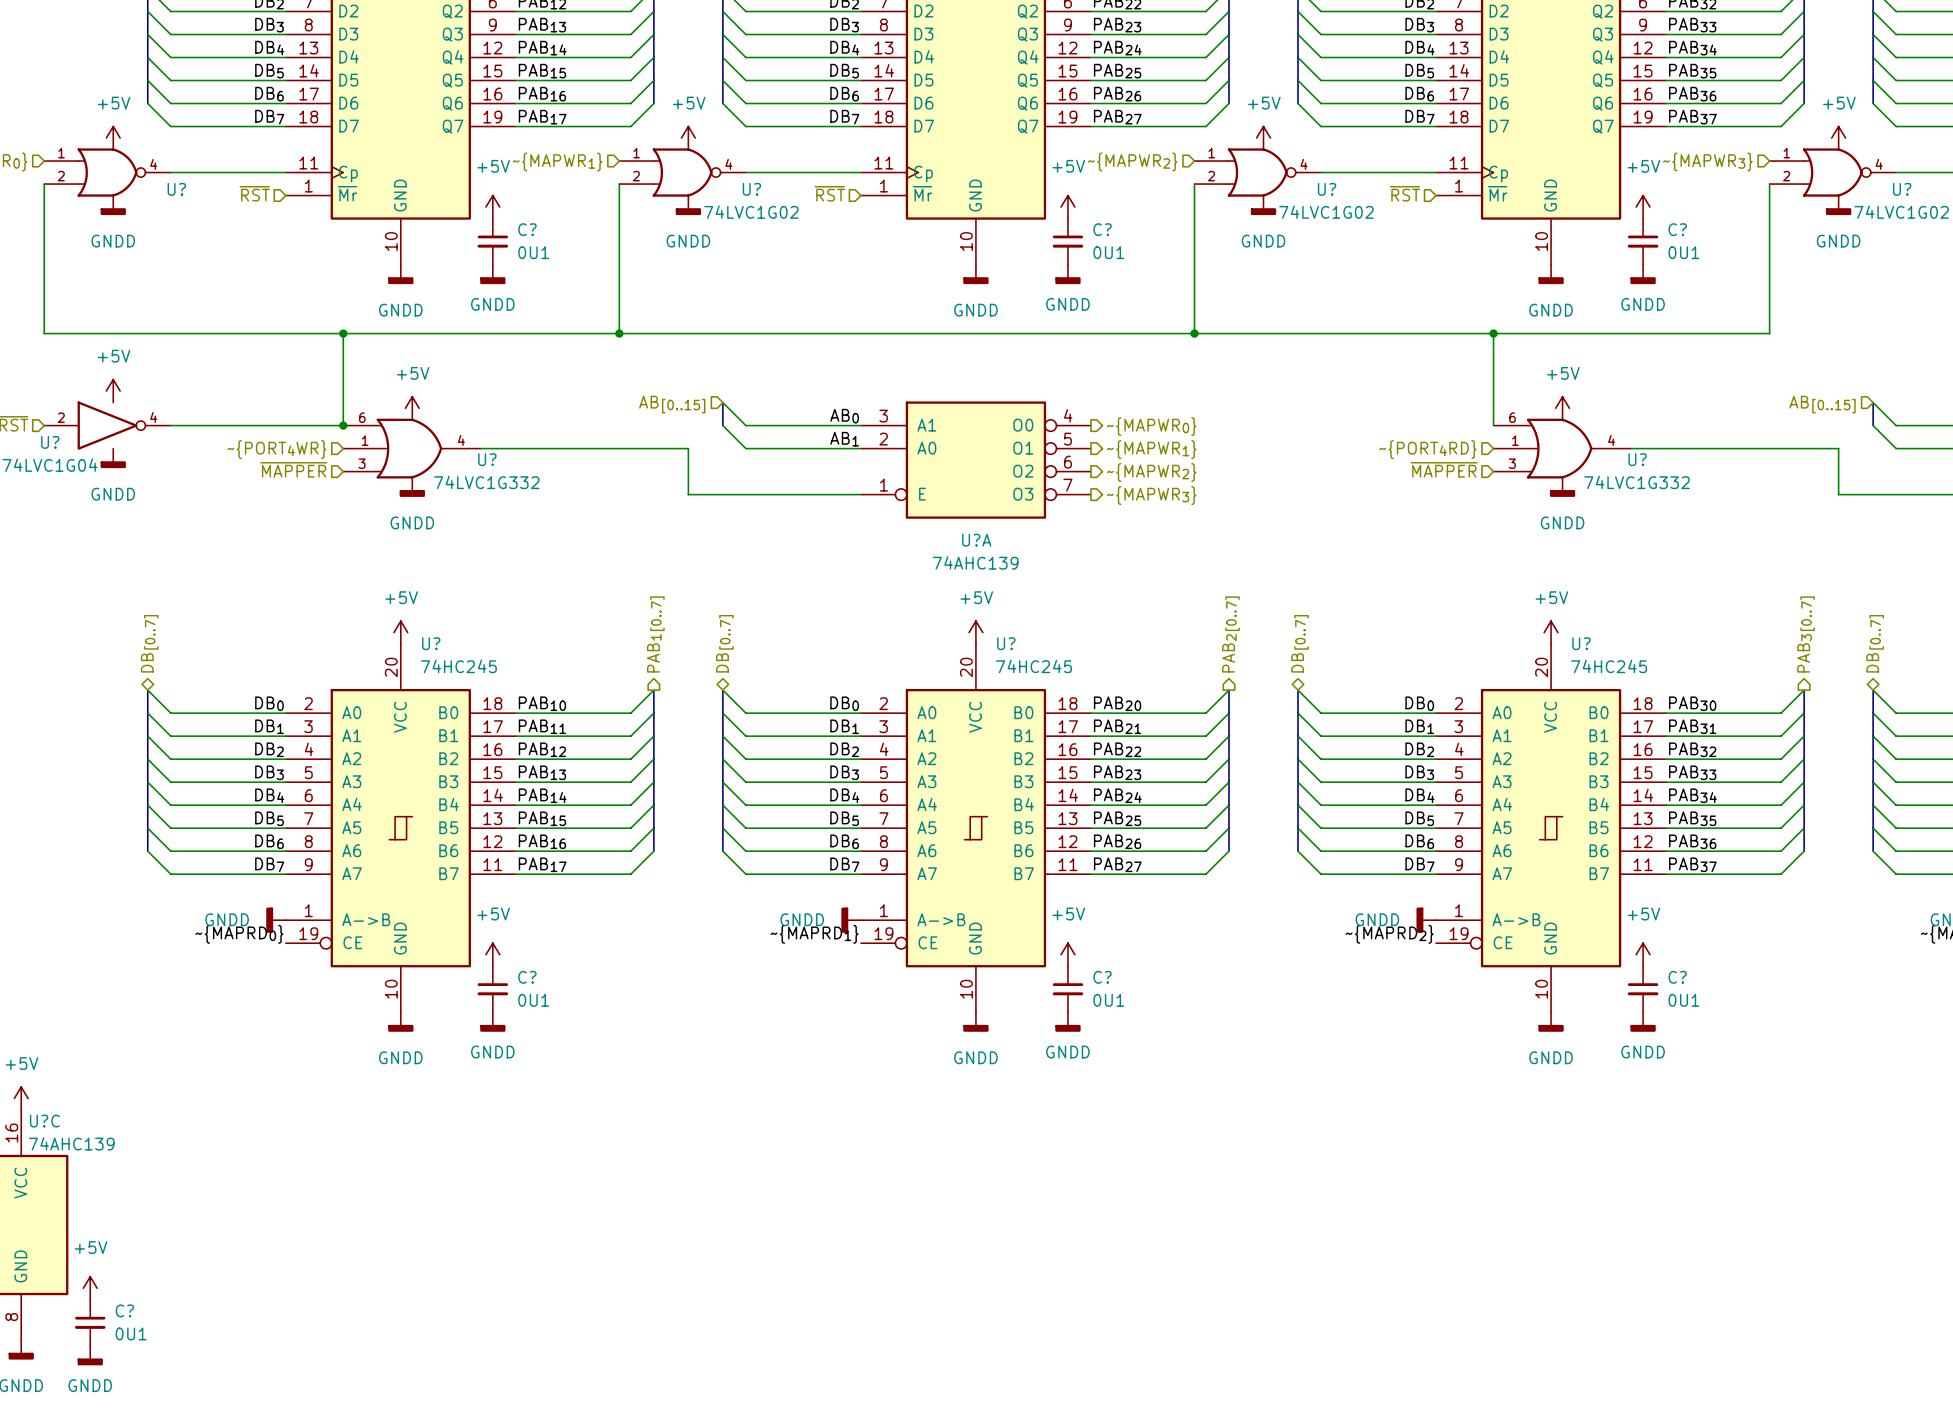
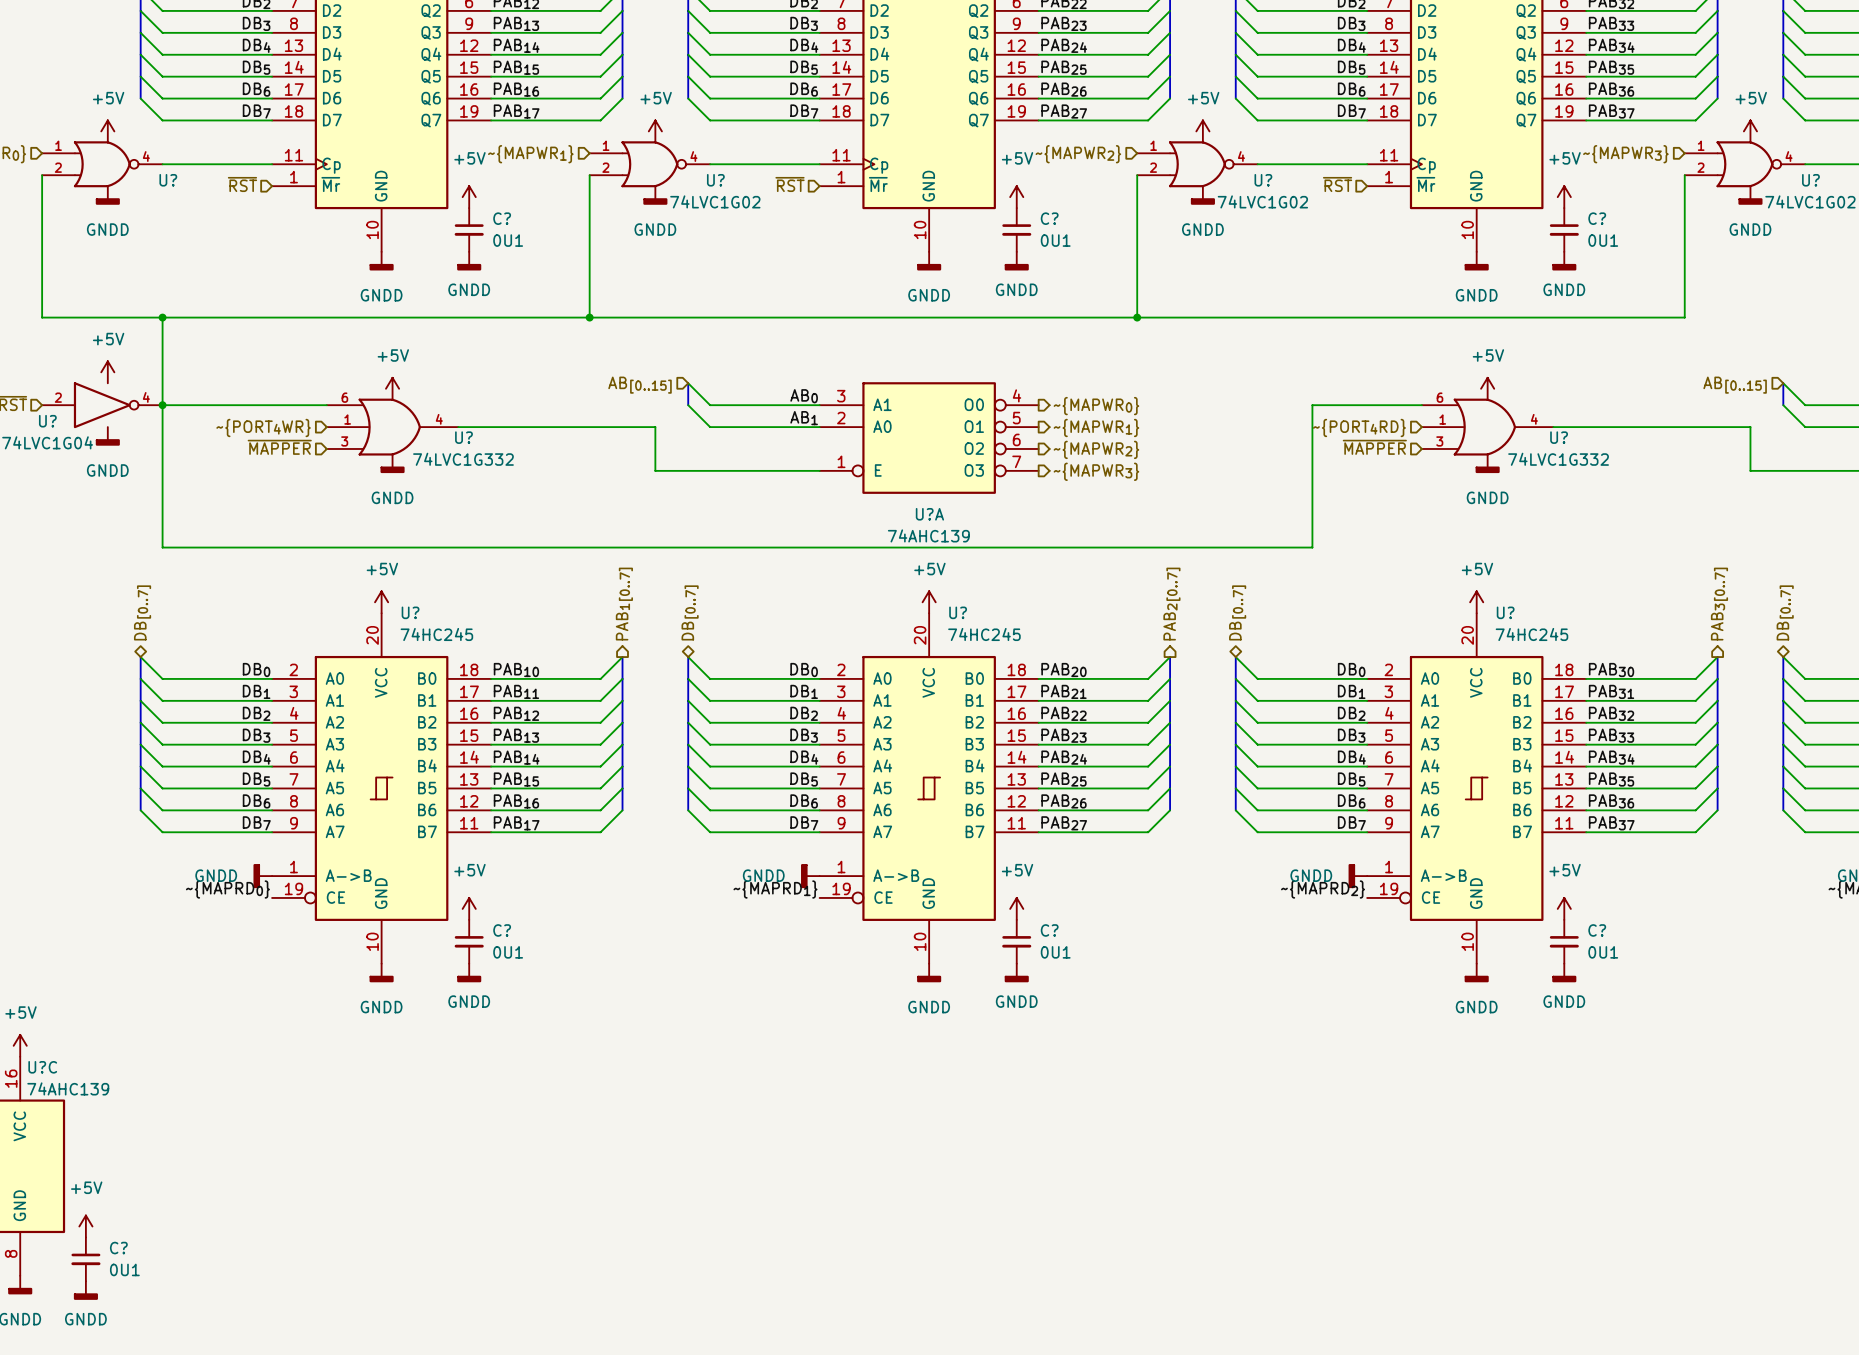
junction: none -> (162, 317)
wire: (343, 333) (343, 425) -> none
junction: (343, 333) -> none
wire: (1493, 333) (1493, 425) -> (162, 317) (162, 547) (1312, 547) (1312, 405) (1421, 405)
junction: (1493, 333) -> none
junction: none -> (162, 405)
junction: (343, 425) -> none

